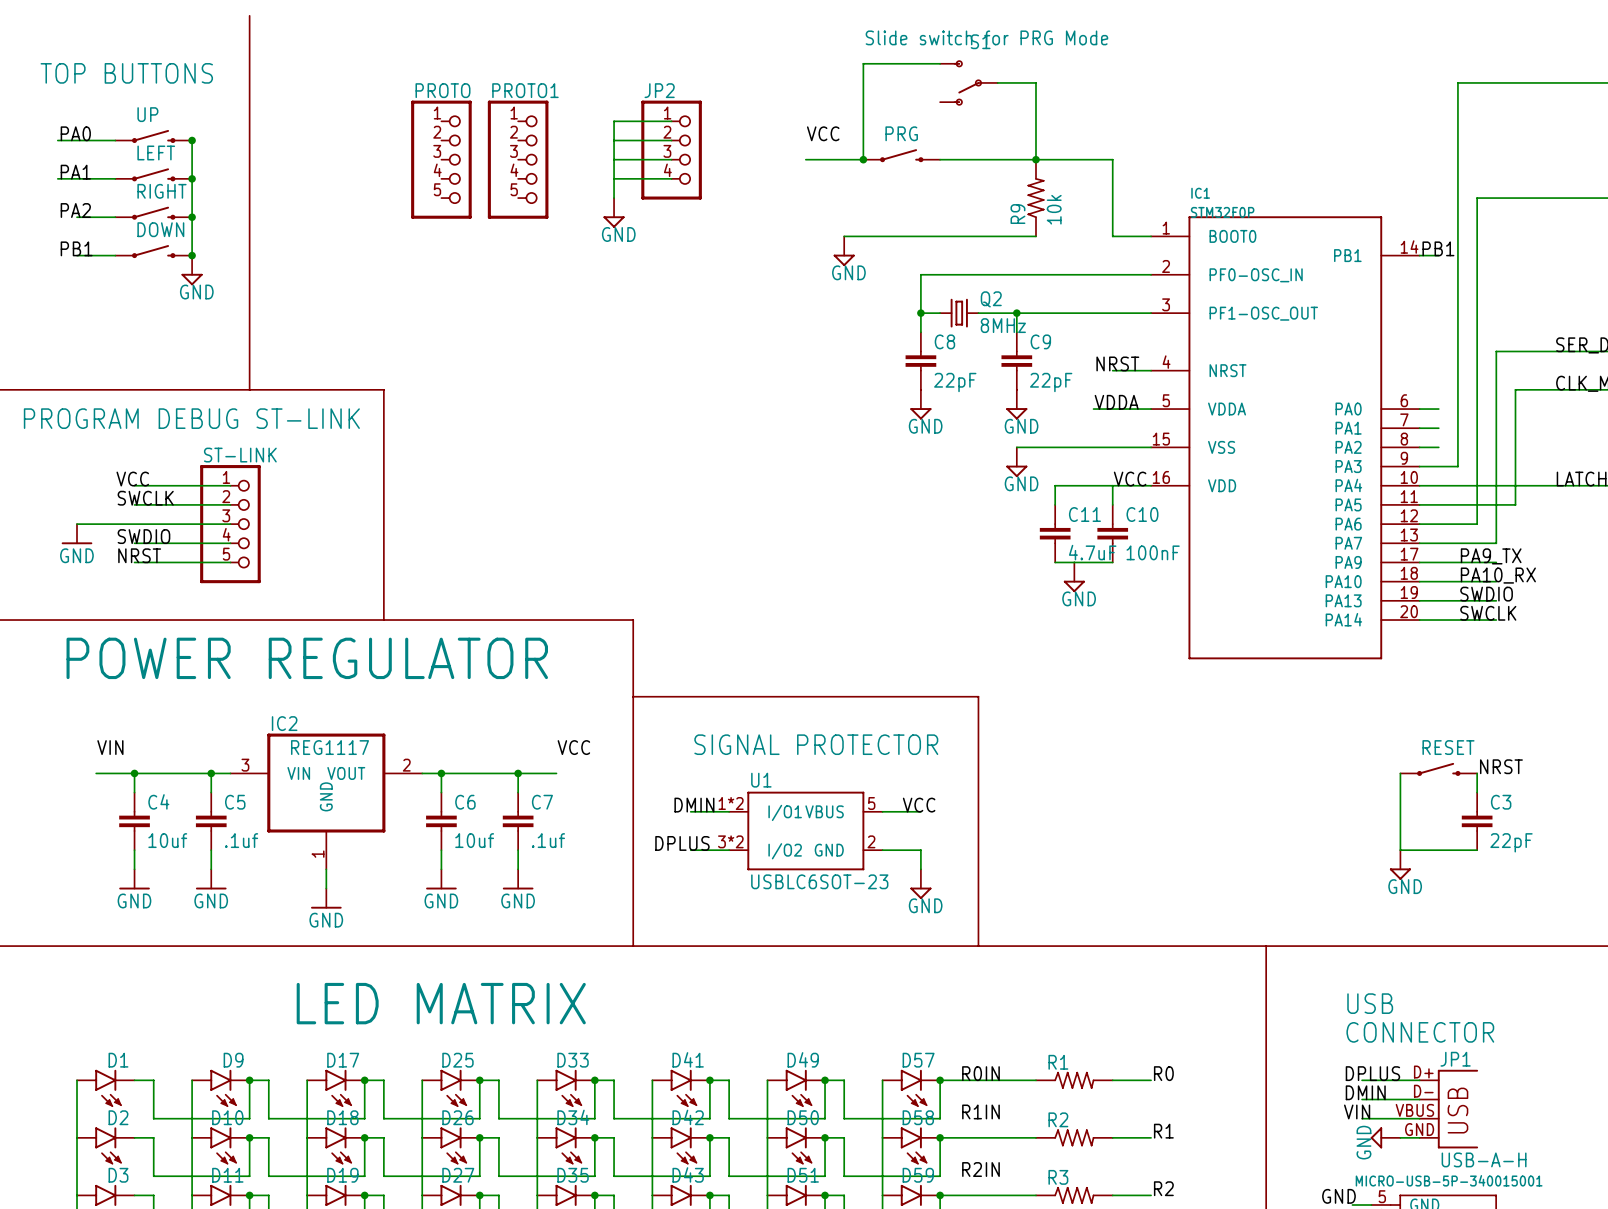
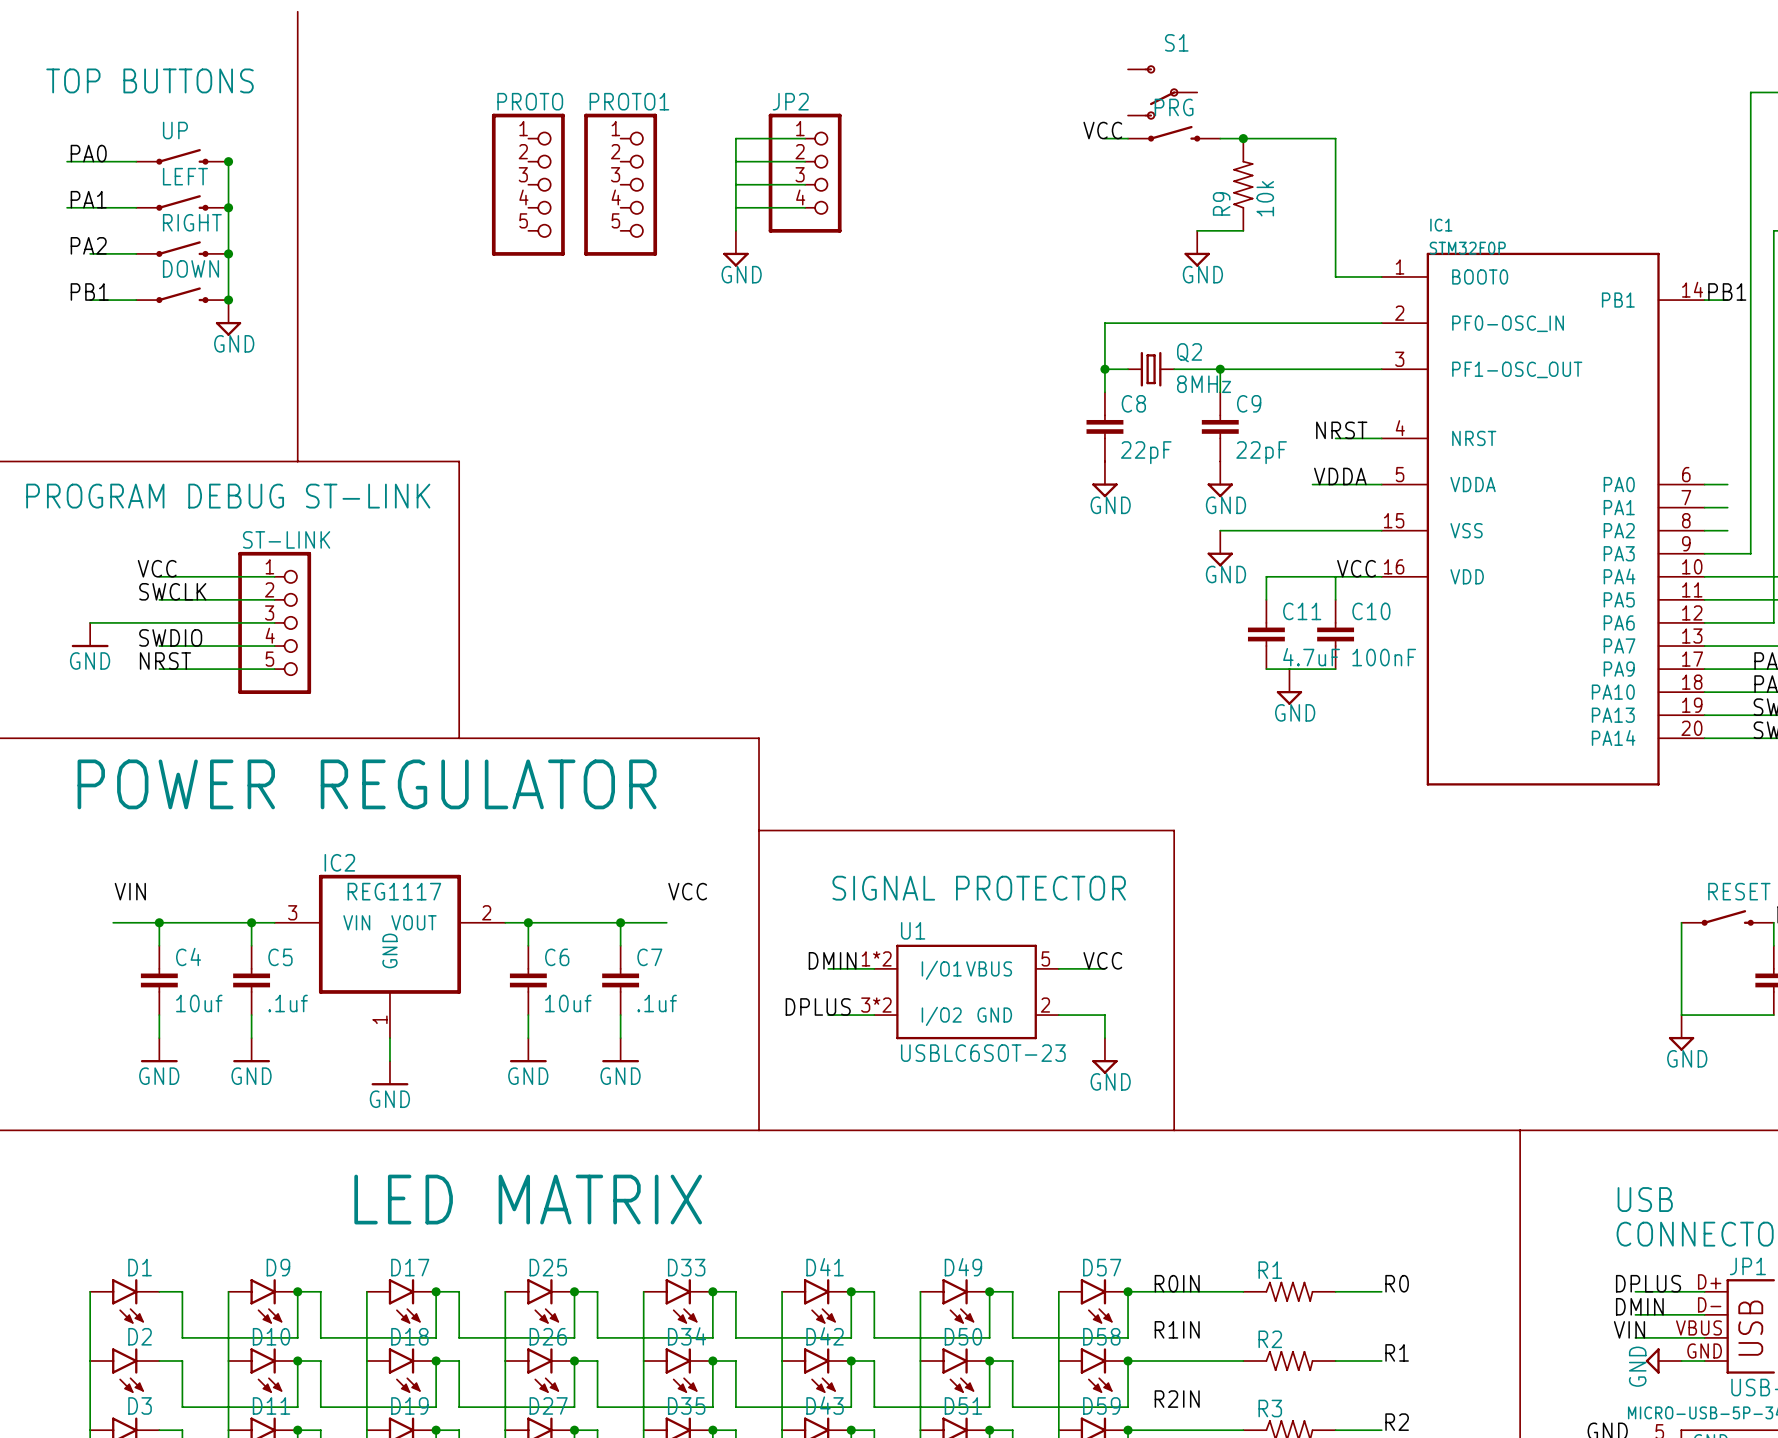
text: Slide switch for PRG Mode (986, 37) -> none
wire: (940, 63) (863, 63) (863, 159) (805, 159) -> none
wire: (997, 82) (1036, 82) (1036, 159) -> none
wire: none -> (1104, 138) (1128, 138)
label position: VCC (823, 133) -> VCC (1102, 130)
PRG position: (901, 155) -> (1174, 133)
junction: (863, 159) -> none
wire: (940, 159) (1112, 159) -> (1220, 138) (1335, 138) (1335, 184)
junction position: (1036, 159) -> (1243, 138)
wire: none -> (1197, 230) (1243, 230)
R9 position: (1036, 198) -> (1243, 184)
wire: (844, 236) (1036, 236) -> none
power symbol position: GND (844, 251) -> GND (1197, 248)

